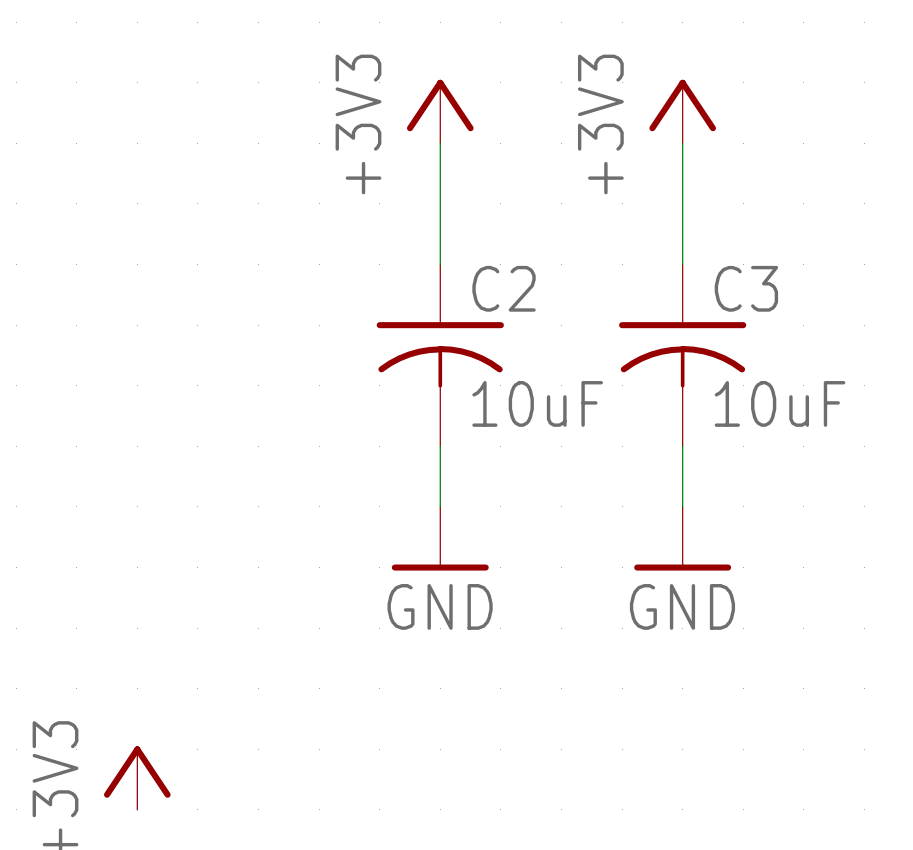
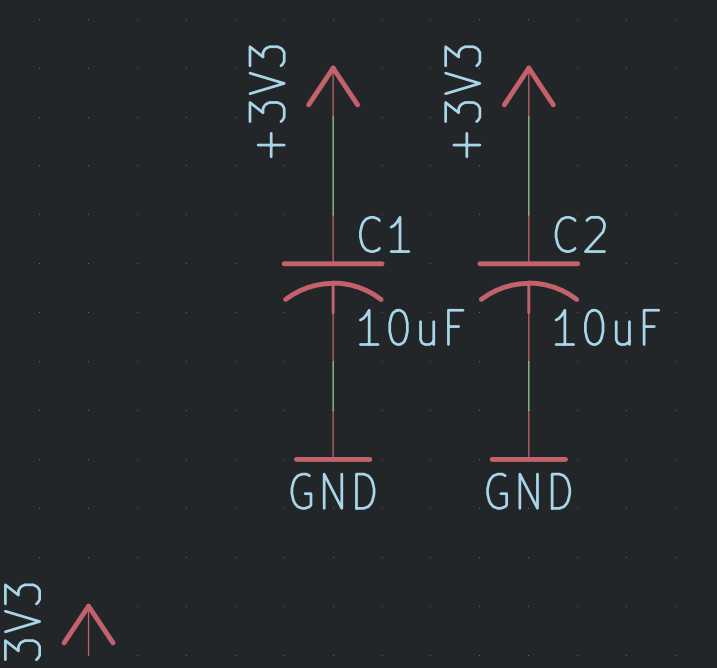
C2 name: C2 (504, 288) -> C1 (384, 234)
C3 name: C3 (746, 288) -> C2 (580, 234)

